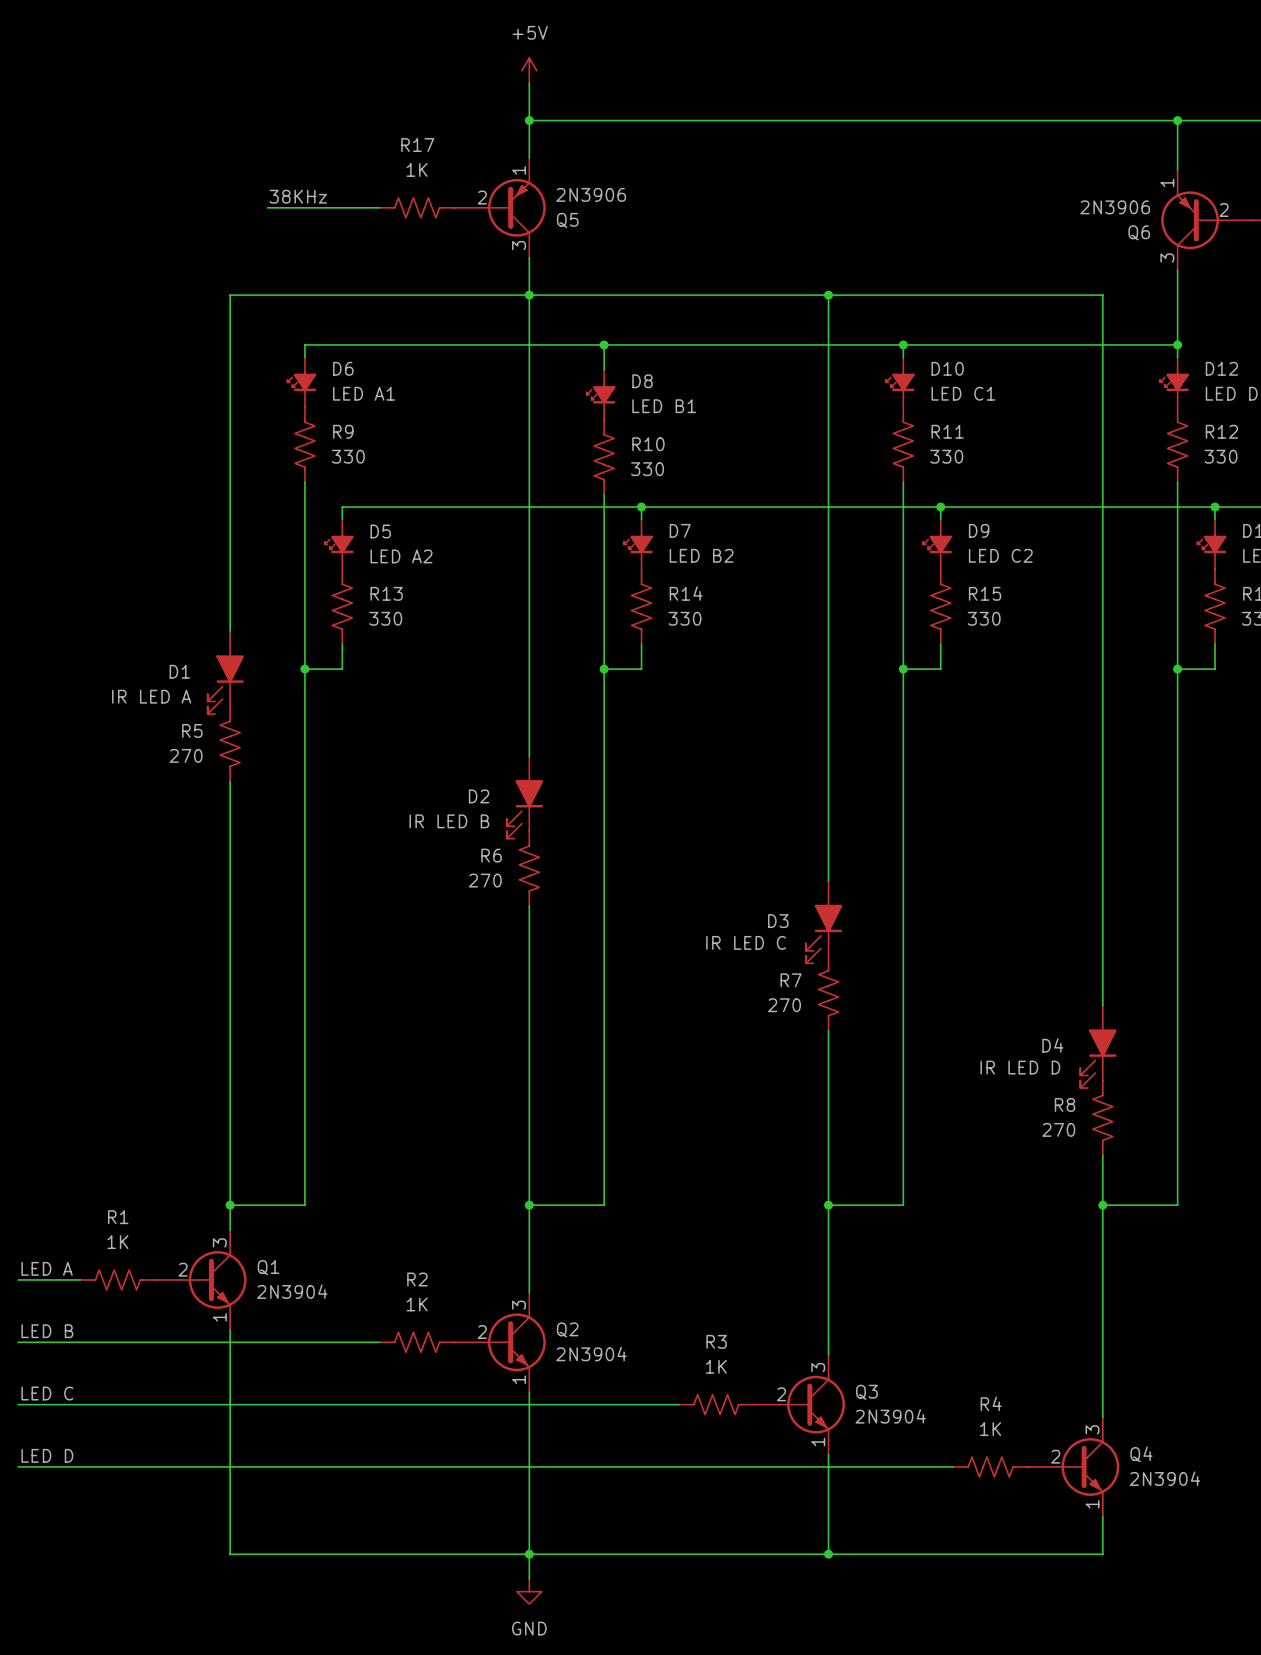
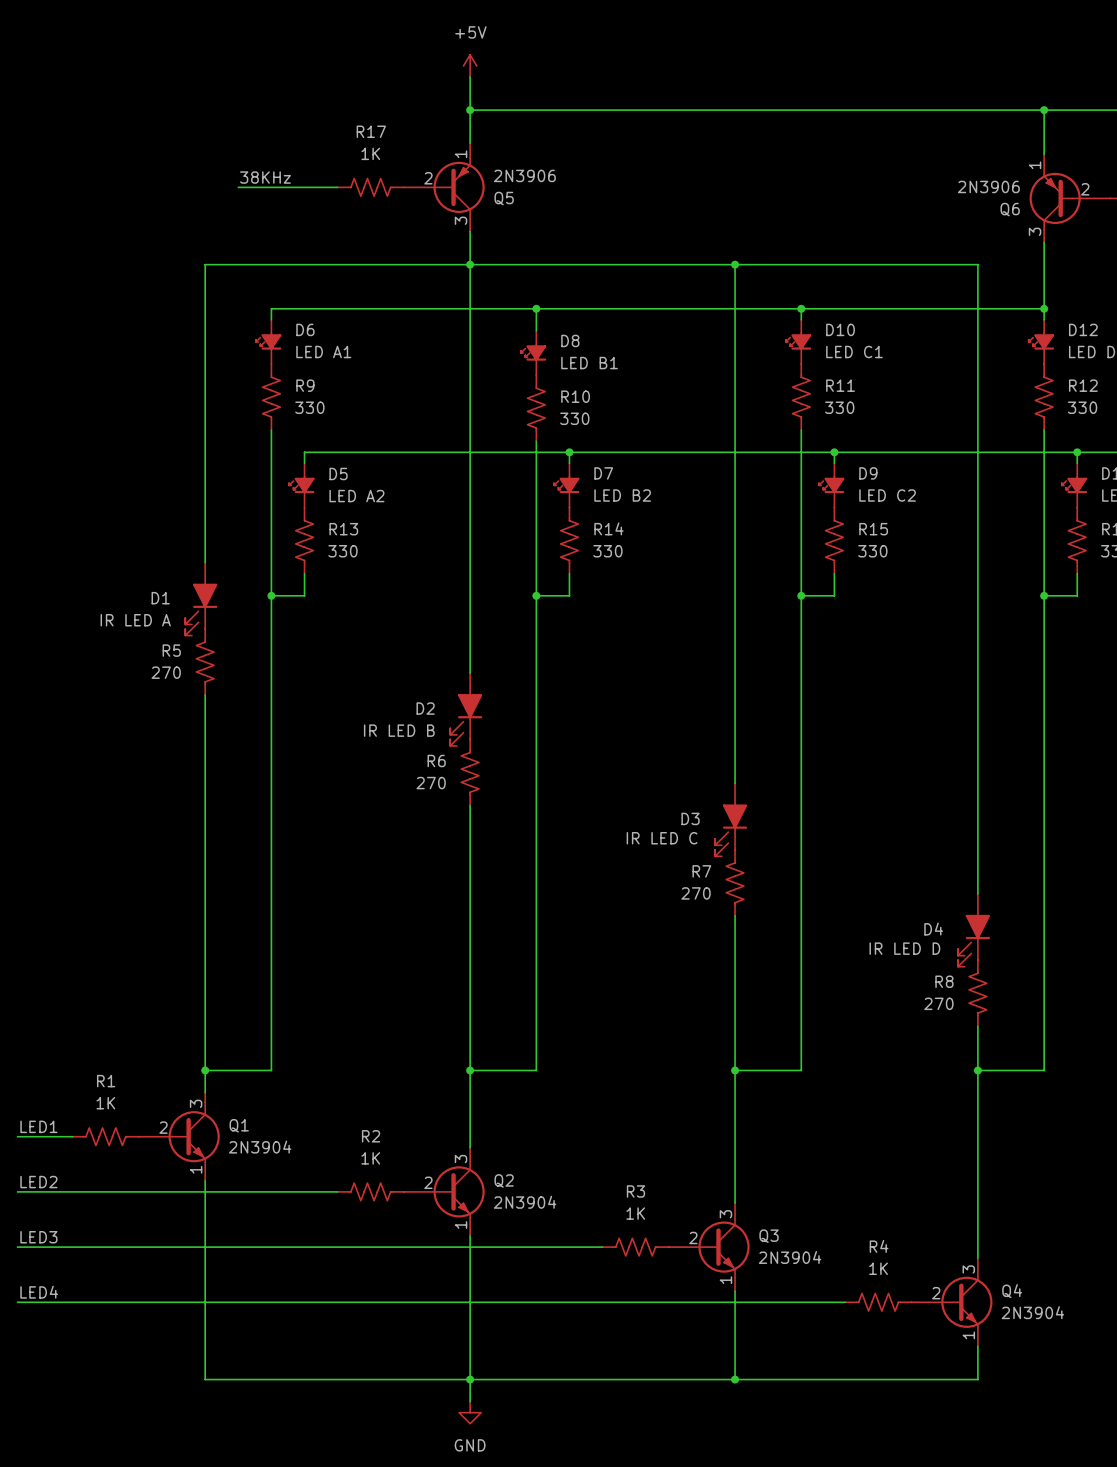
label: LED A (47, 1268) -> LED1 (38, 1126)
label: LED B (47, 1331) -> LED2 (38, 1182)
label: LED C (47, 1393) -> LED3 (38, 1237)
label: LED D (47, 1455) -> LED4 (39, 1292)

